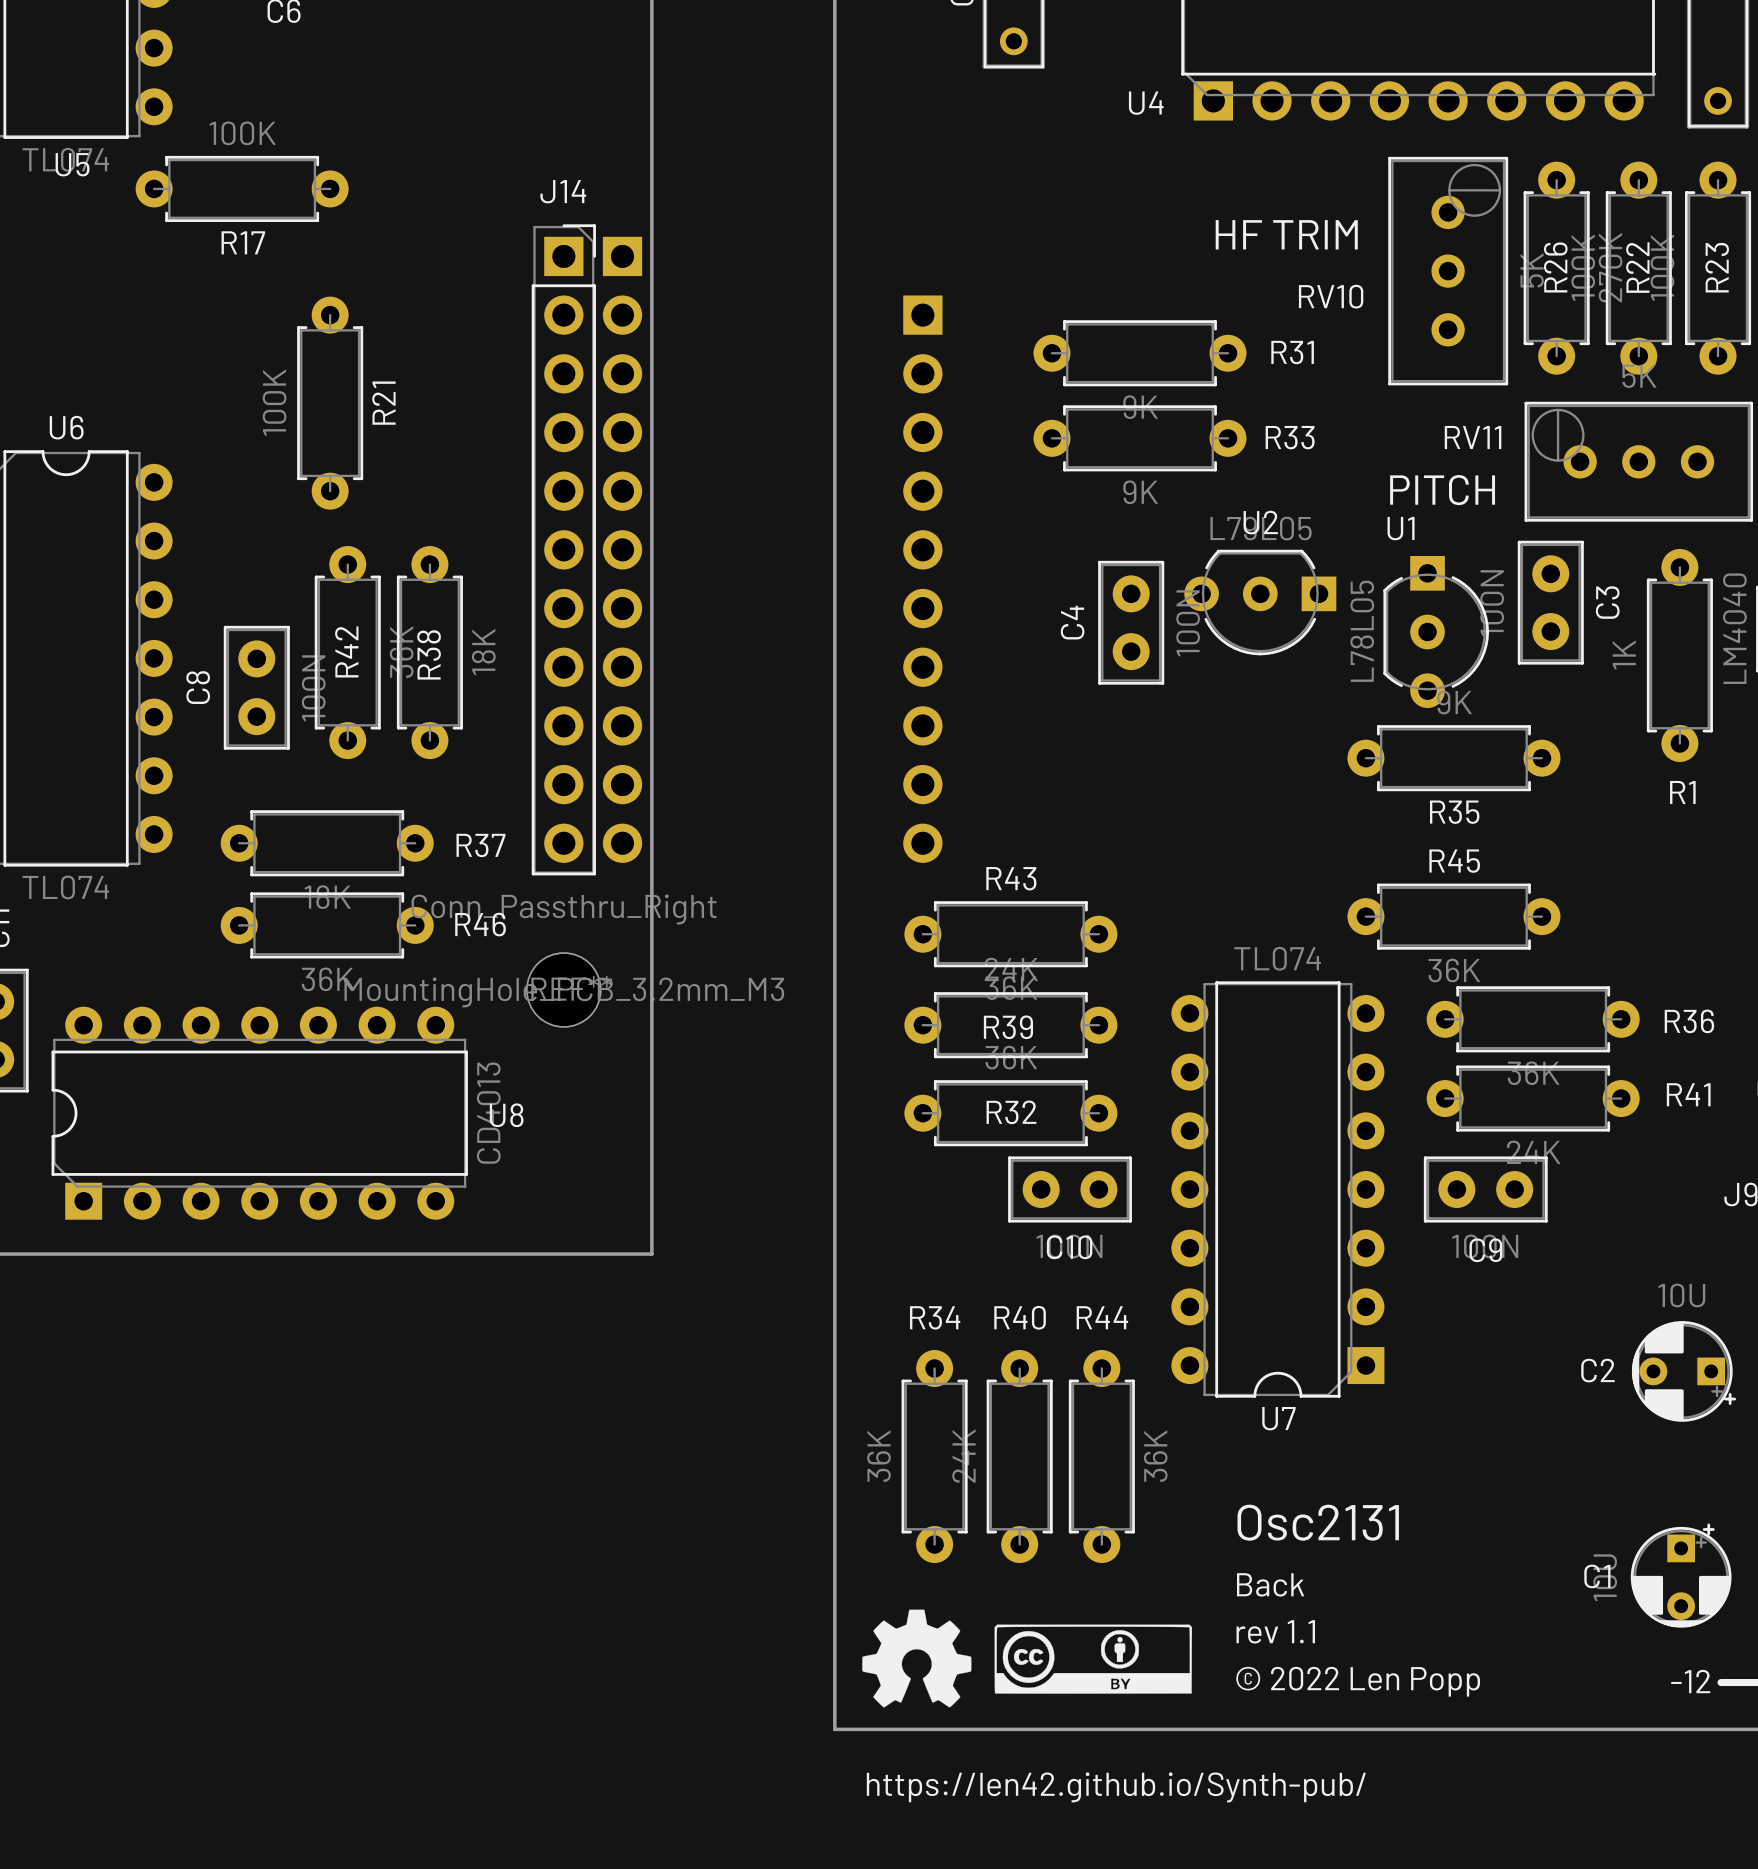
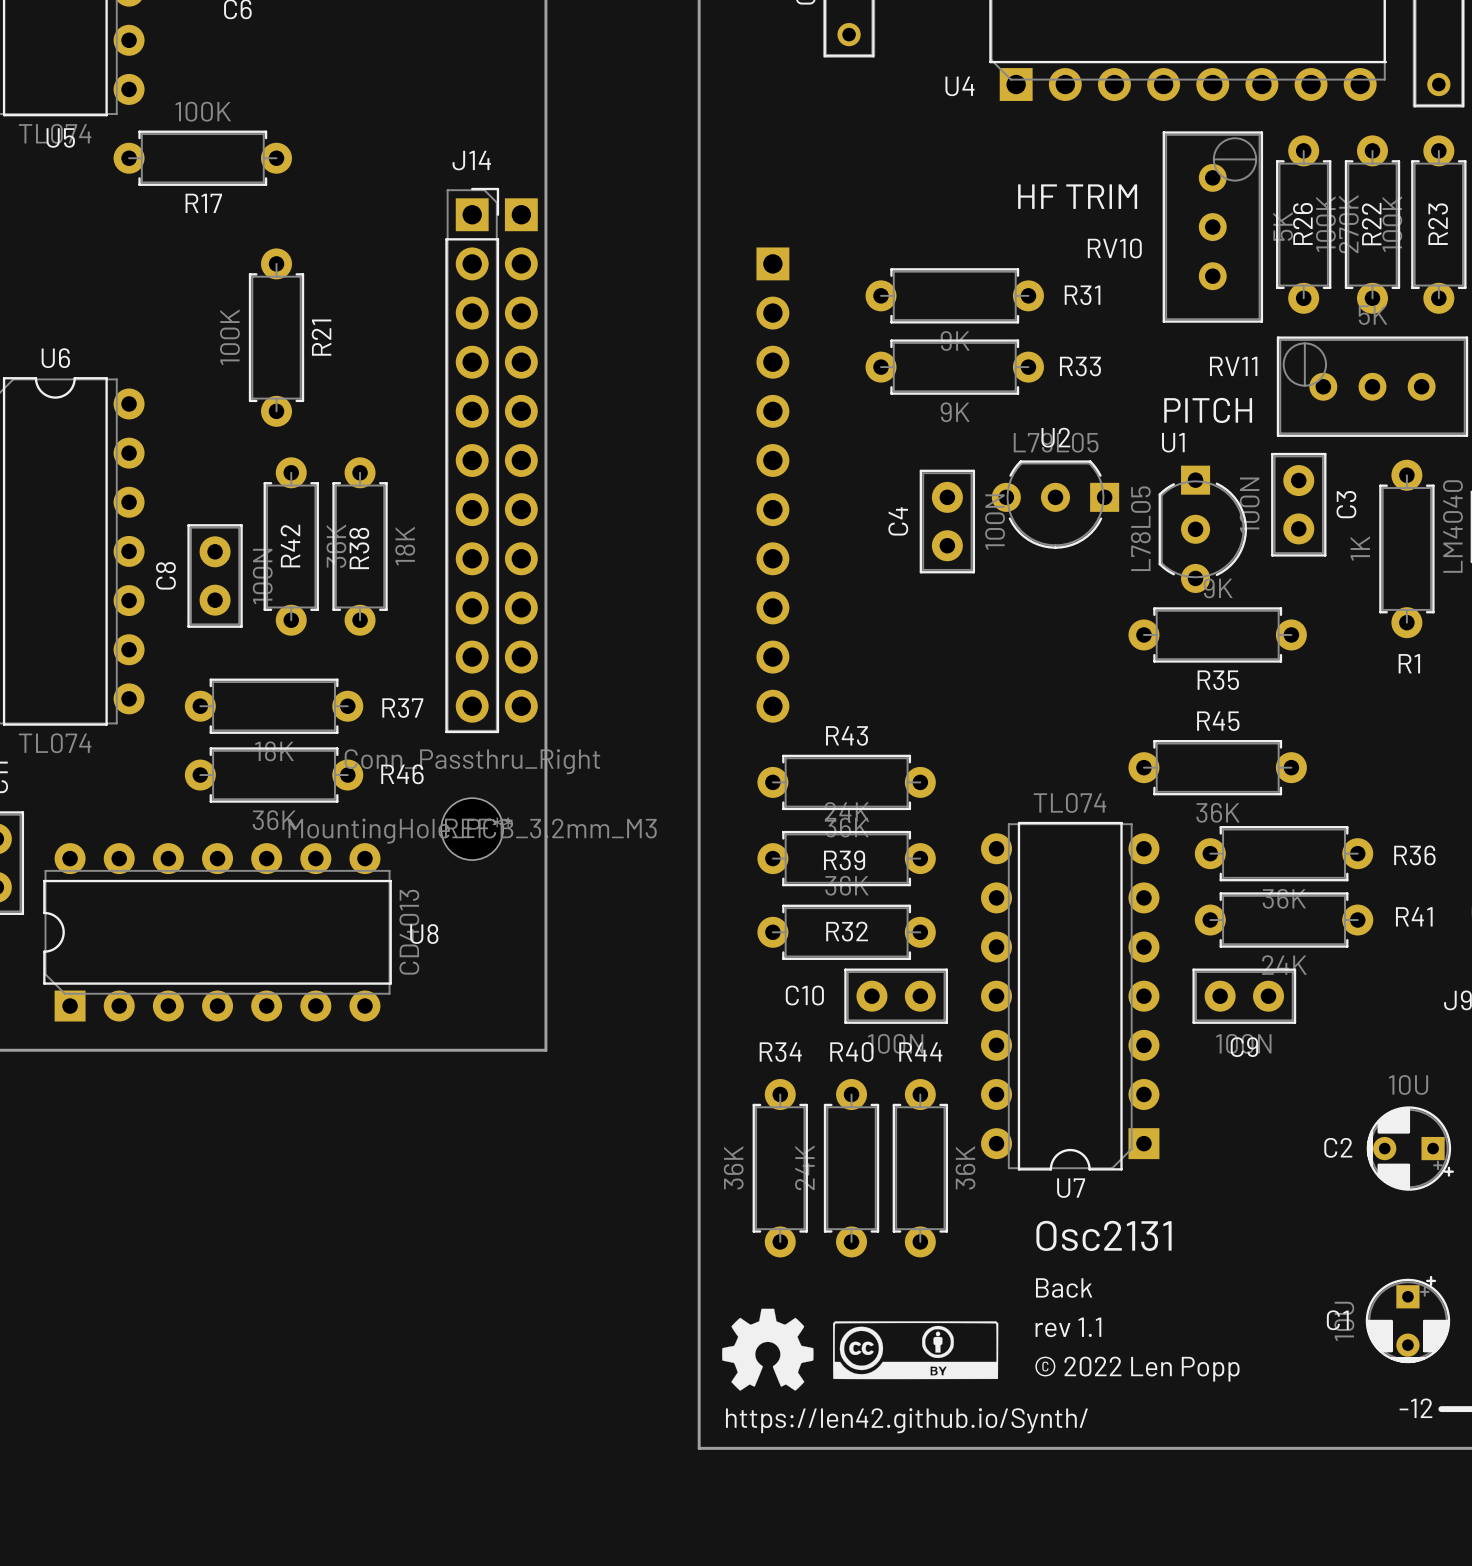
C10 name position: C10 (1069, 1247) -> C10 (804, 995)
R34 position: (934, 1456) -> (780, 1168)
R40 position: (1019, 1456) -> (851, 1168)
R44 position: (1101, 1456) -> (920, 1168)
text position: Osc2131 (1318, 1522) -> Osc2131 (1104, 1235)
text: none -> Back (1064, 1288)
text: Back (1270, 1584) -> rev 1.1 (1068, 1327)
text: rev 1.1 (1275, 1631) -> © 2022 Len Popp (1137, 1369)
drawing position: (916, 1658) -> (767, 1349)
drawing position: (1093, 1659) -> (915, 1350)
text: © 2022 Len Popp (1358, 1681) -> none
text: none -> https://len42.github.io/Synth/ (906, 1420)
text: https://len42.github.io/Synth-pub/ (1116, 1787) -> none

